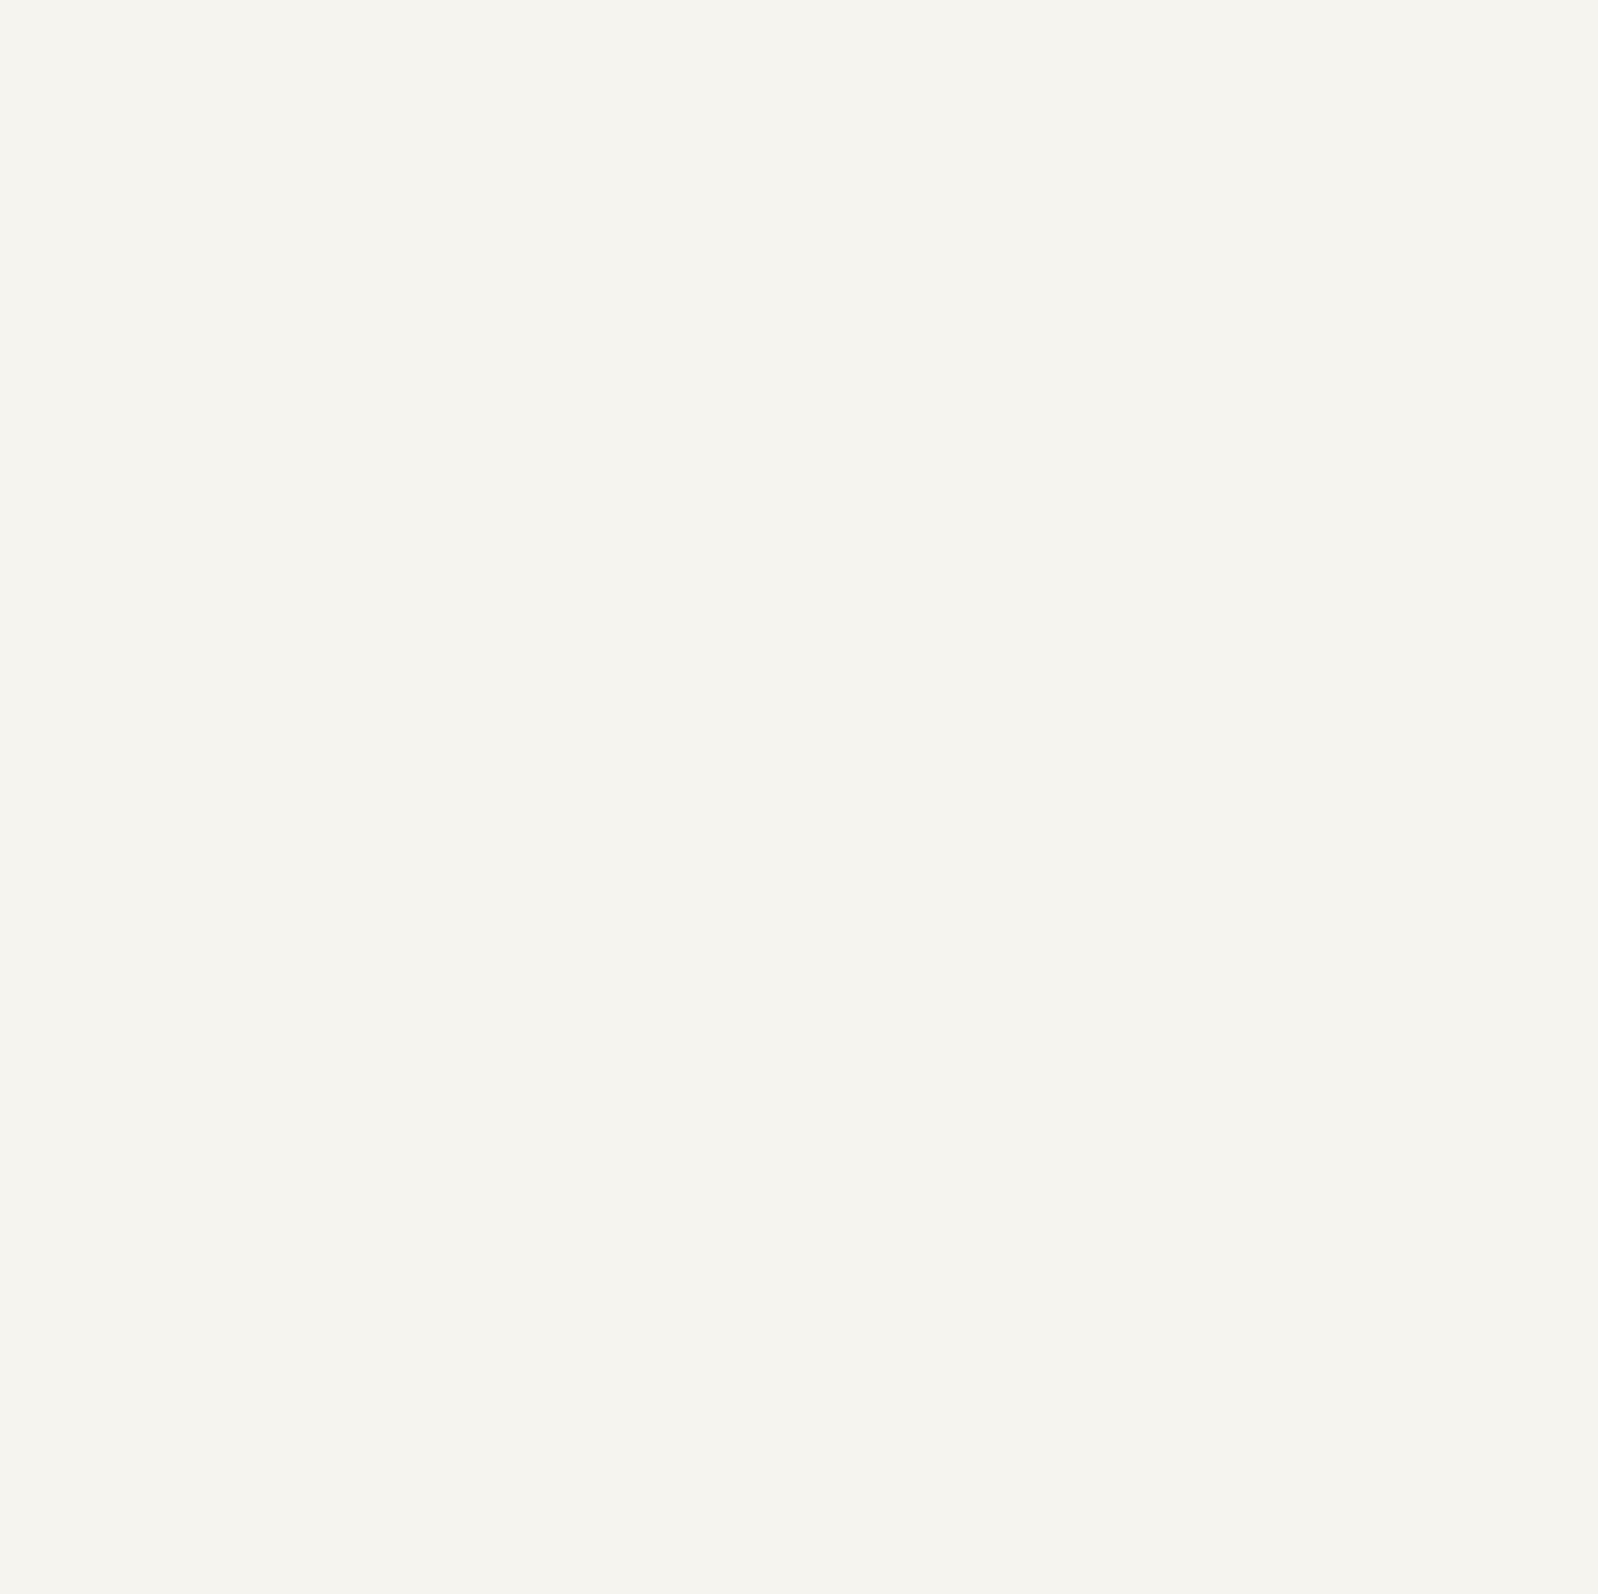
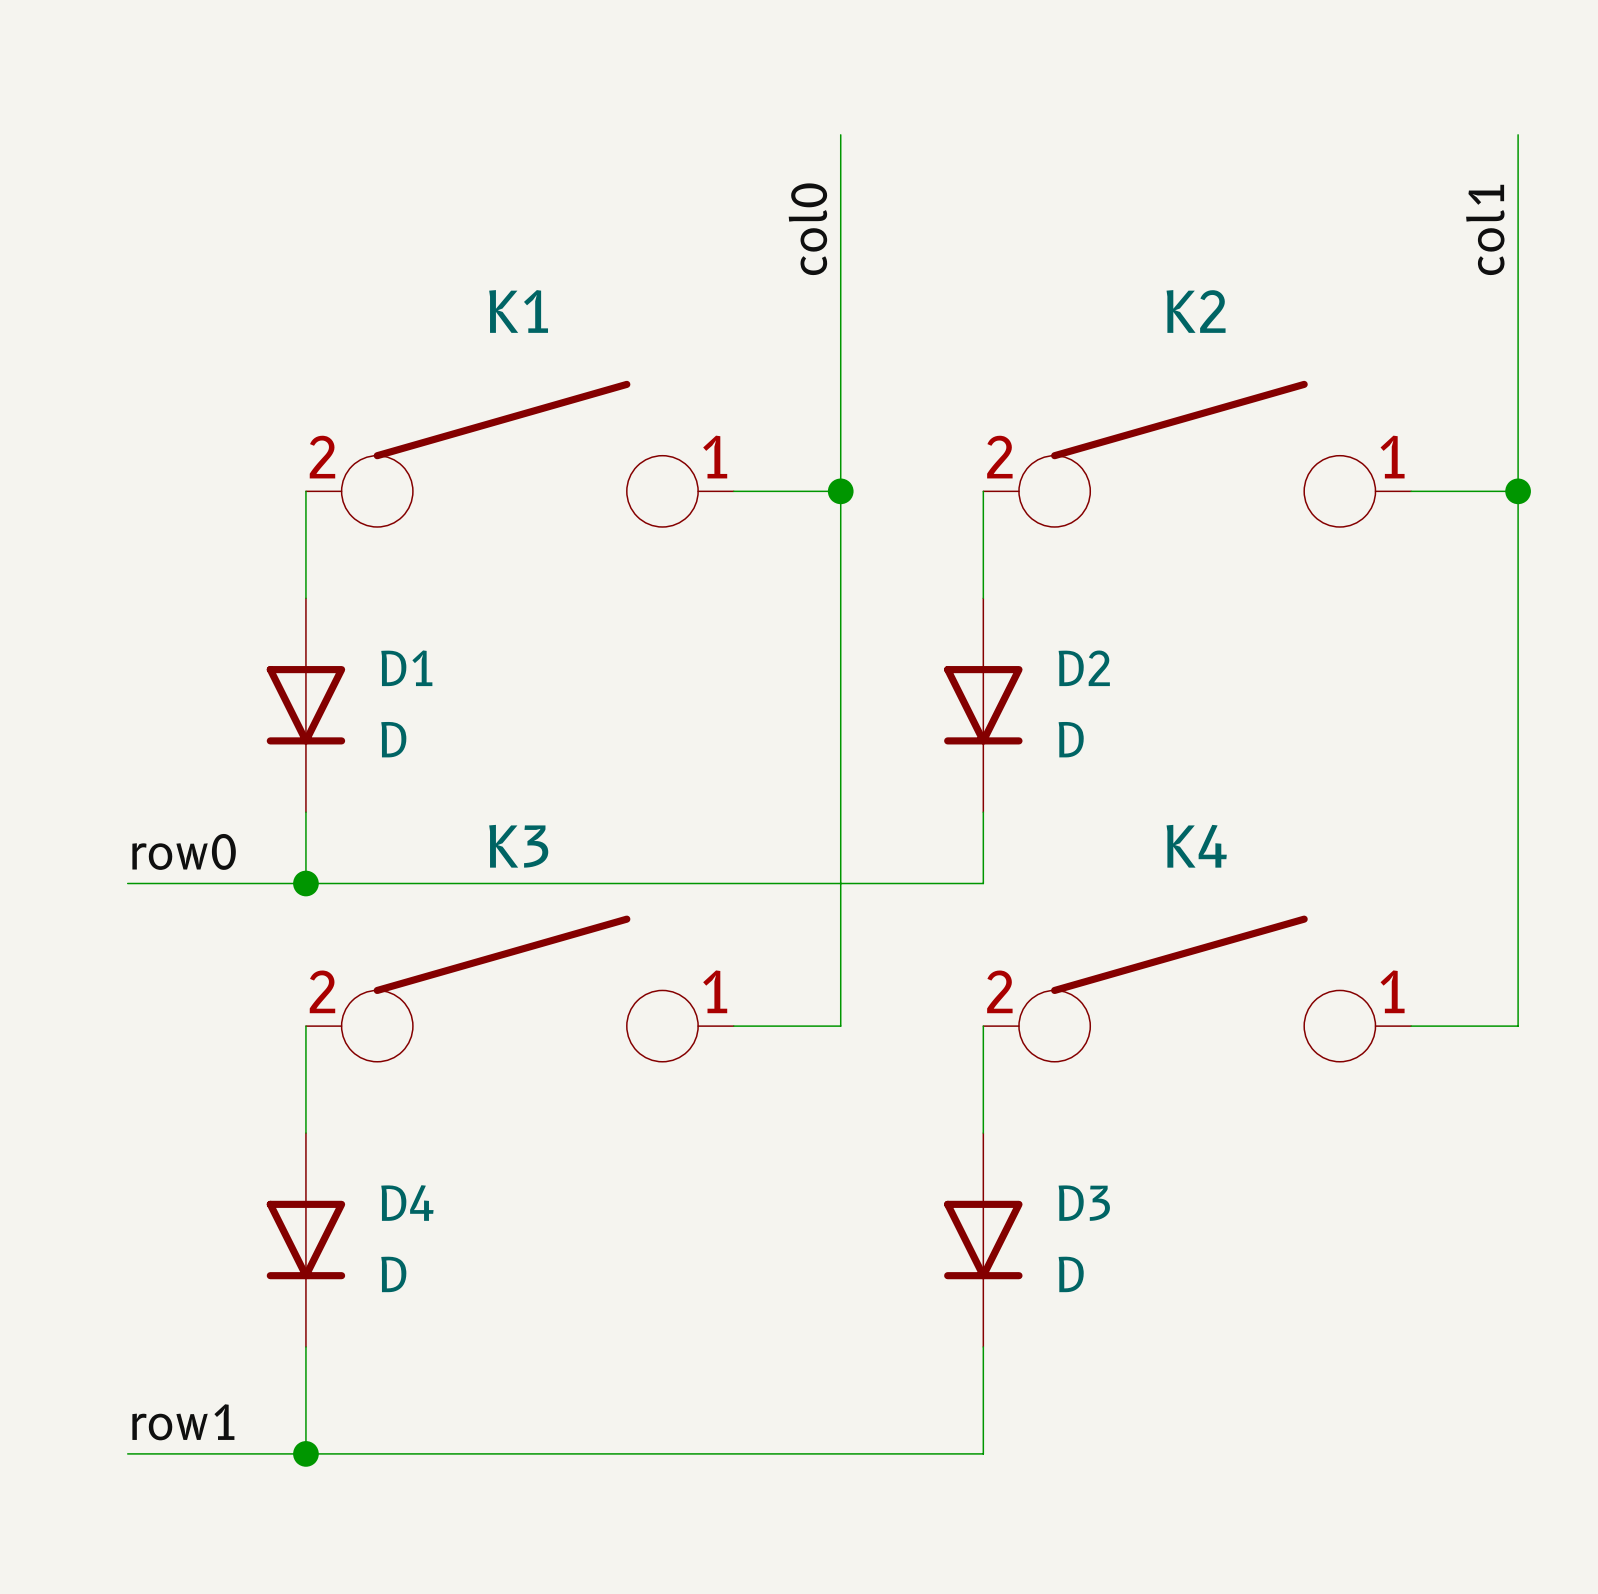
wire: none -> (840, 134) (840, 1026) (733, 1026)
wire: none -> (1518, 134) (1518, 1026) (1411, 1026)
label: none -> col0 (807, 229)
label: none -> col1 (1485, 229)
K1: none -> (519, 453)
K2: none -> (1197, 453)
wire: none -> (305, 491) (305, 598)
wire: none -> (733, 491) (840, 491)
junction: none -> (840, 491)
wire: none -> (983, 491) (983, 598)
wire: none -> (1411, 491) (1518, 491)
junction: none -> (1518, 491)
D1: none -> D (305, 705)
D2: none -> D (983, 705)
wire: none -> (305, 812) (305, 883)
wire: none -> (983, 812) (983, 883) (127, 883)
label: none -> row0 (184, 851)
junction: none -> (305, 883)
K3: none -> (519, 988)
K4: none -> (1197, 988)
wire: none -> (305, 1026) (305, 1133)
wire: none -> (983, 1026) (983, 1133)
D4: none -> D (305, 1240)
D3: none -> D (983, 1240)
wire: none -> (305, 1346) (305, 1453)
wire: none -> (983, 1346) (983, 1453) (127, 1453)
label: none -> row1 (183, 1422)
junction: none -> (305, 1453)

